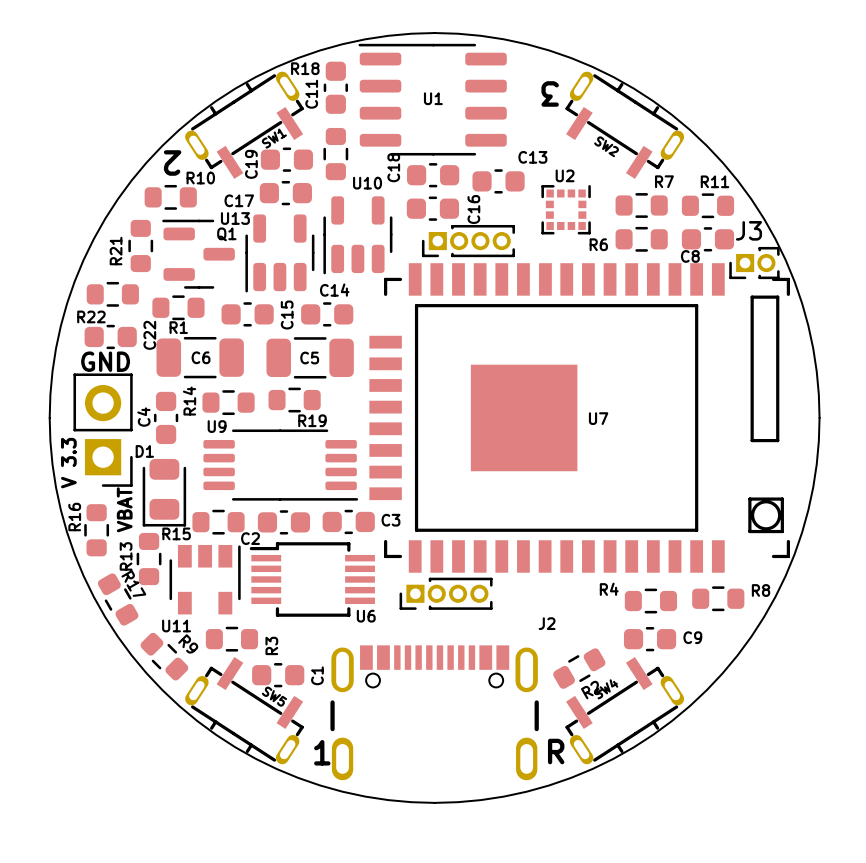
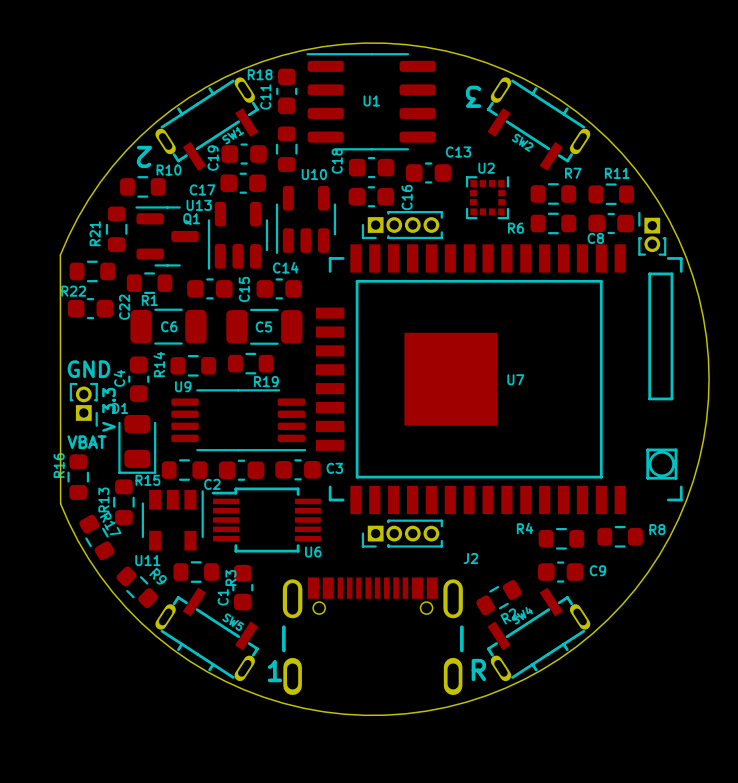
board edge: (434, 33) (365, 39) (320, 50) (276, 66) (215, 101) (162, 145) (117, 199) (83, 259) (60, 325) (52, 371) (49, 417) (55, 487) (67, 532) (83, 575) (117, 636) (162, 690) (215, 734) (276, 768) (320, 785) (365, 796) (434, 802) (481, 800) (526, 791) (592, 768) (653, 734) (706, 690) (751, 636) (785, 575) (808, 510) (816, 464) (819, 417) (813, 348) (794, 281) (764, 218) (737, 180) (706, 145) (653, 101) (592, 66) (549, 50) (504, 39) (434, 33) -> (60, 255) (60, 503) (88, 558) (126, 607) (156, 636) (189, 660) (244, 689) (303, 708) (364, 715) (405, 713) (446, 707) (505, 688) (542, 669) (576, 646) (622, 604) (659, 555) (686, 500) (703, 440) (709, 378) (703, 317) (686, 257) (658, 202) (635, 168) (607, 138) (559, 99) (504, 69) (446, 51) (384, 43) (322, 46) (282, 55) (243, 68) (206, 87) (172, 109) (126, 150) (88, 199) (60, 255)
part: none -> (652, 233)
J3: (754, 263) -> none
text position: GND (105, 361) -> GND (88, 369)
part footprint: [73, 373, 133, 487] -> [69, 382, 98, 427]
text position: V 3.3 (68, 463) -> V 3.3 (109, 409)
text rotation: 0° (124, 509) -> 90° clockwise (86, 442)
part position: (446, 593) -> (402, 533)
C1 rotation: 0° (278, 675) -> 90° clockwise (242, 587)

